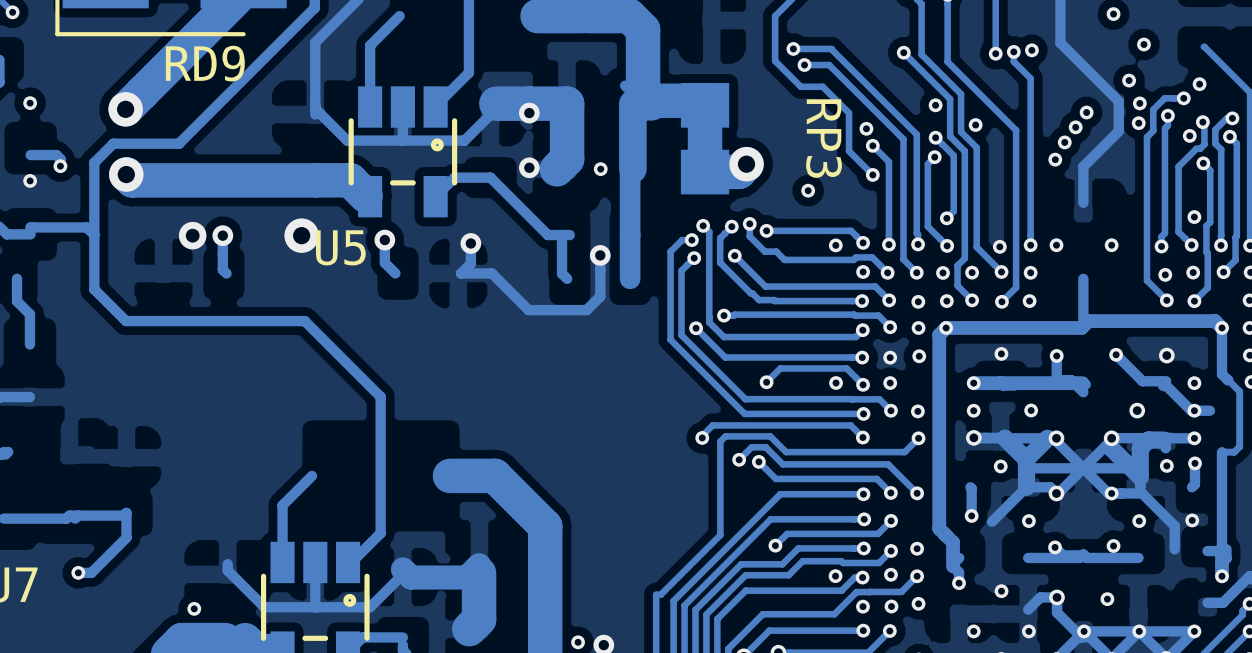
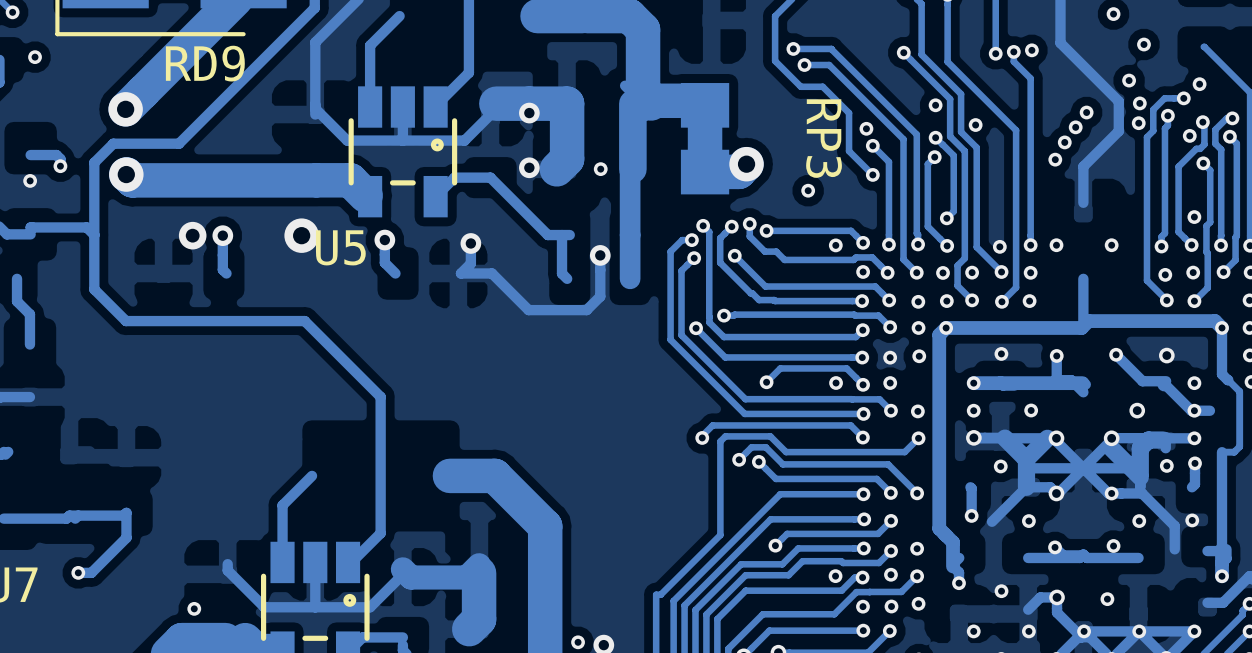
via position: (30, 103) -> (35, 57)

